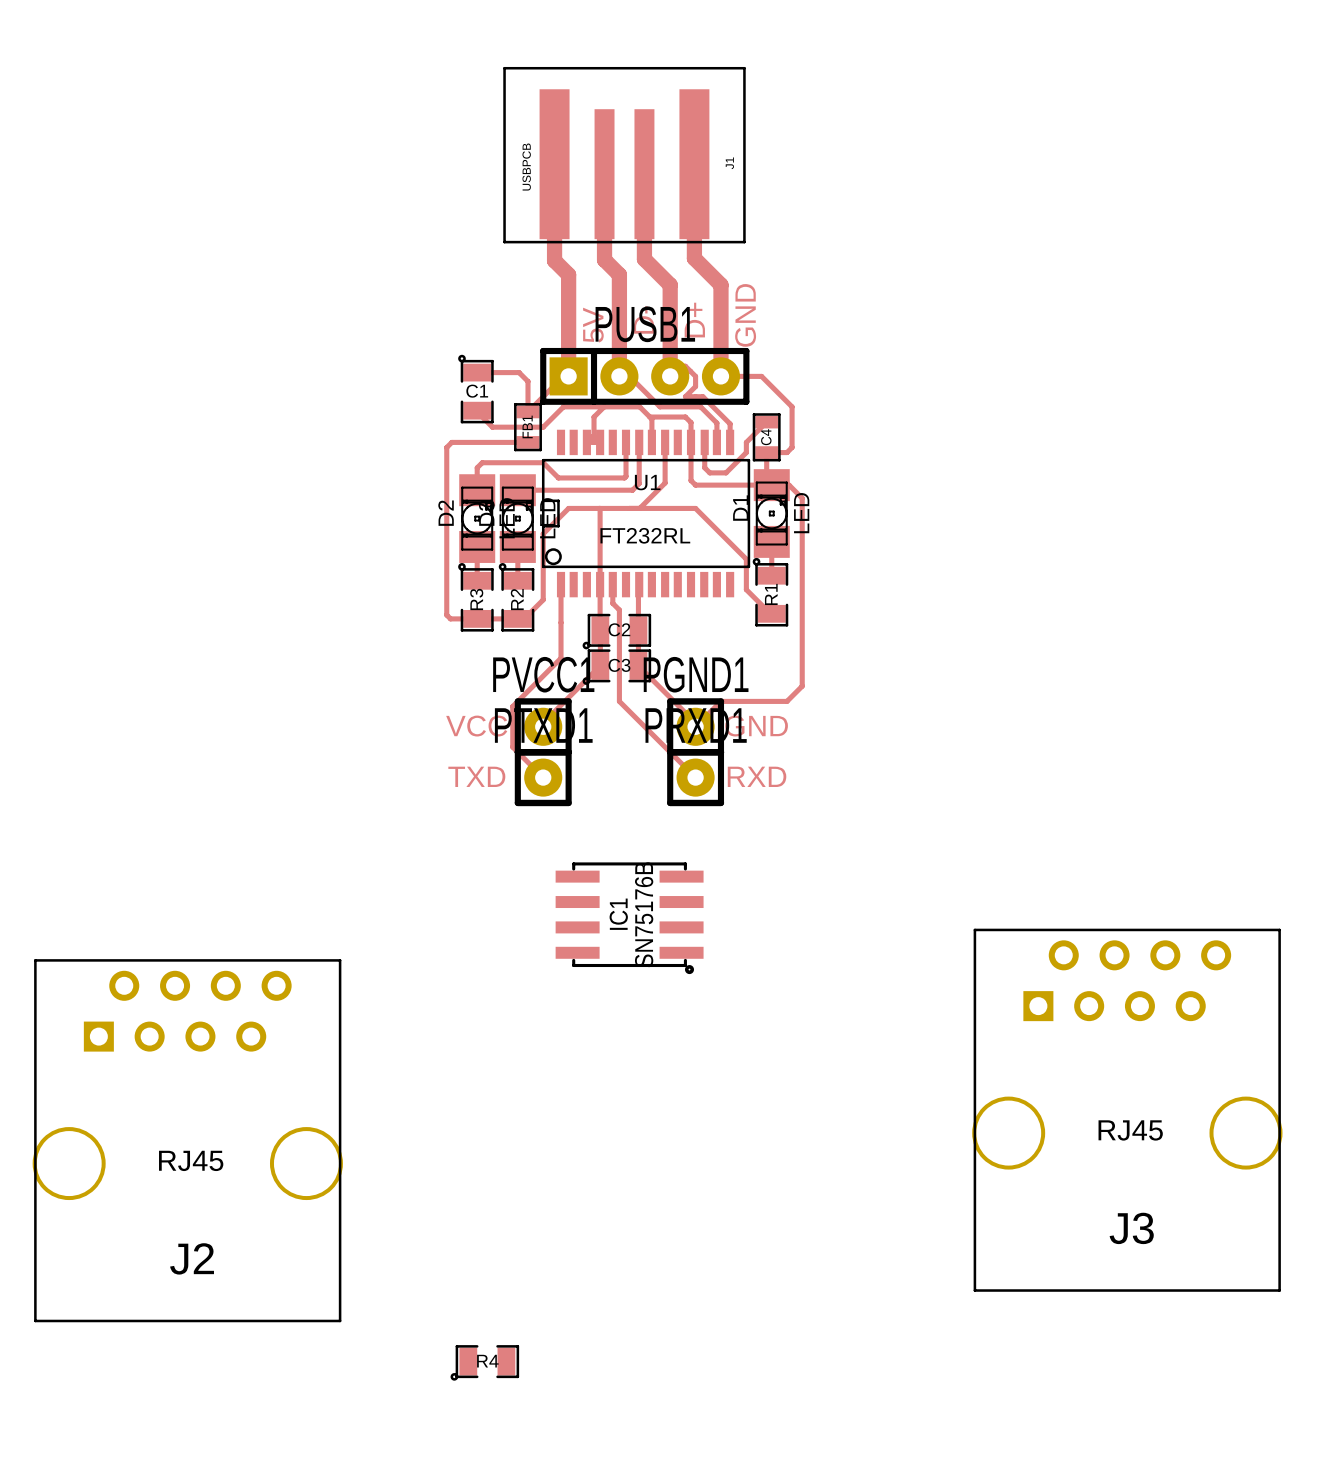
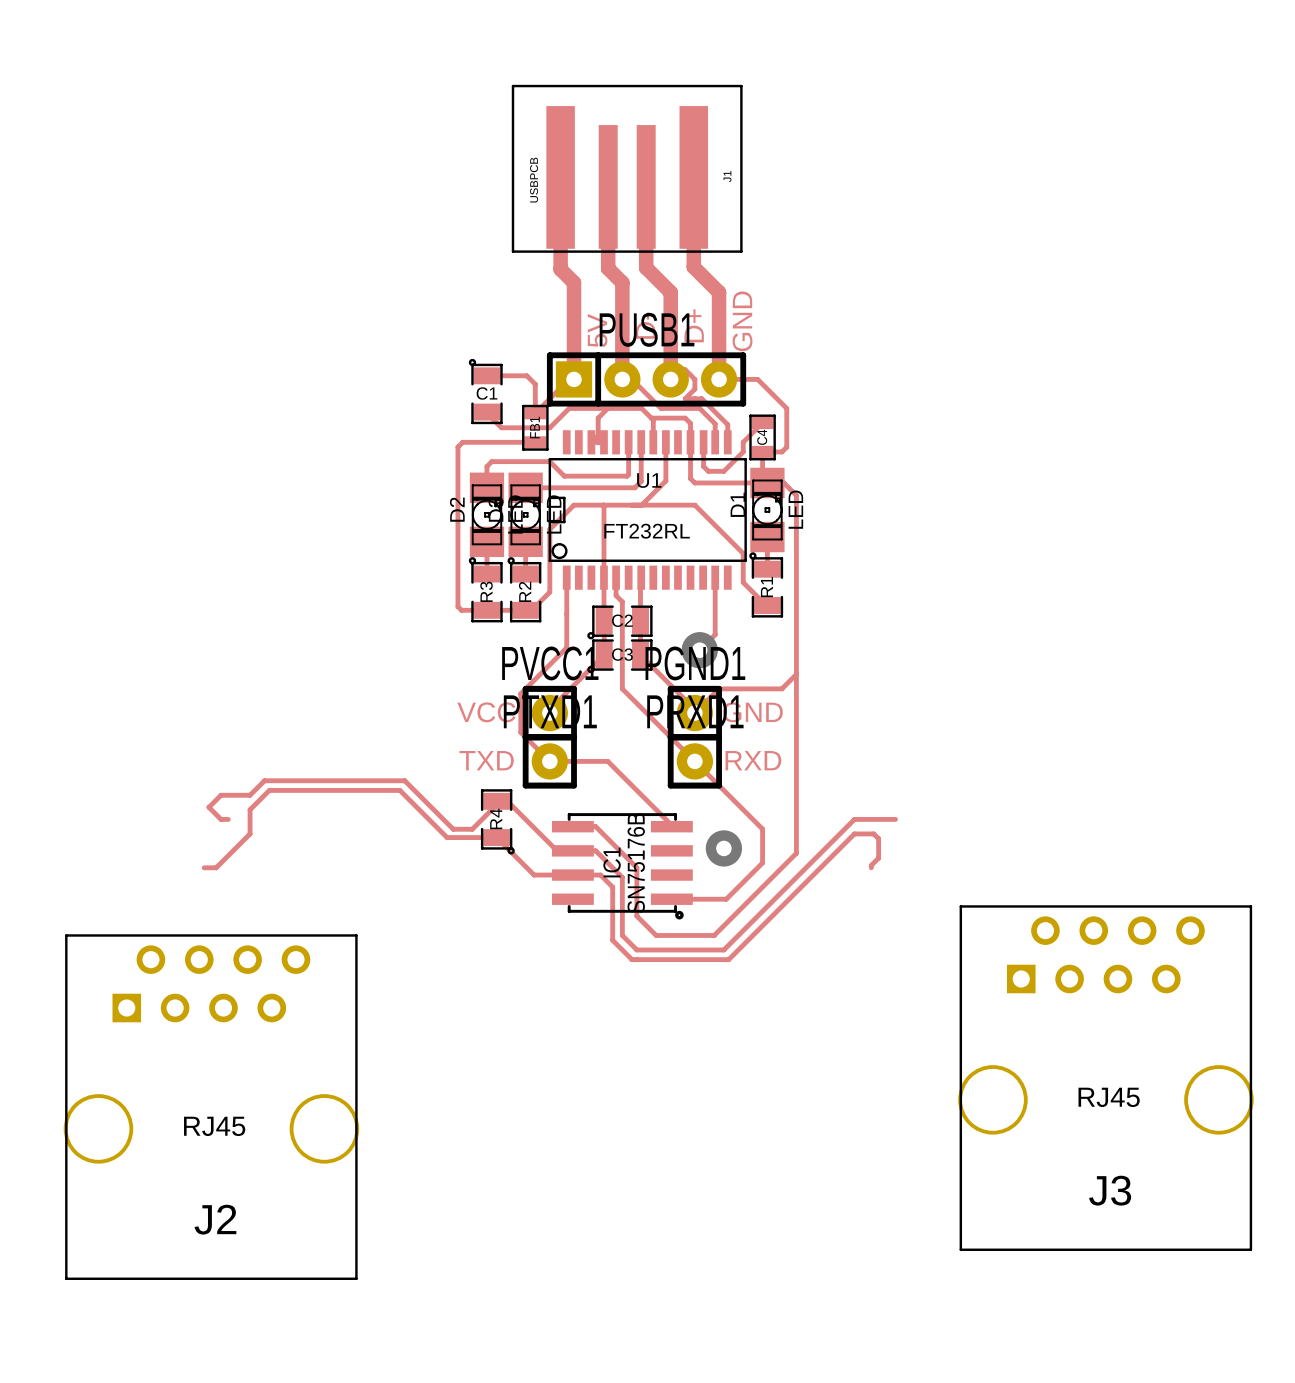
track: none -> (715, 577) (715, 634) (699, 650)
via: none -> (699, 650)
track: none -> (796, 674) (796, 853) (714, 935) (656, 935) (636, 916) (636, 867) (595, 826) (572, 826)
track: none -> (549, 761) (607, 761) (671, 826)
track: none -> (694, 761) (762, 829) (762, 862) (726, 899) (671, 899)
track: none -> (228, 819) (221, 819) (208, 807) (221, 795) (250, 795) (264, 780) (404, 780) (453, 829) (472, 829) (496, 804) (496, 801) (507, 801) (557, 850) (595, 850) (622, 877) (622, 935) (636, 949) (723, 949) (854, 819) (895, 819)
via: none -> (723, 848)
track: none -> (204, 867) (216, 867) (250, 833) (250, 809) (269, 790) (399, 790) (447, 837) (496, 837) (534, 875) (600, 875) (612, 887) (612, 940) (632, 959) (728, 959) (854, 833) (873, 833) (878, 838) (878, 858) (871, 867)
IC1 position: (629, 918) -> (622, 866)
R4 rotation: 0° (484, 1362) -> 90° counterclockwise (497, 821)
R4 position: (484, 1362) -> (497, 821)

